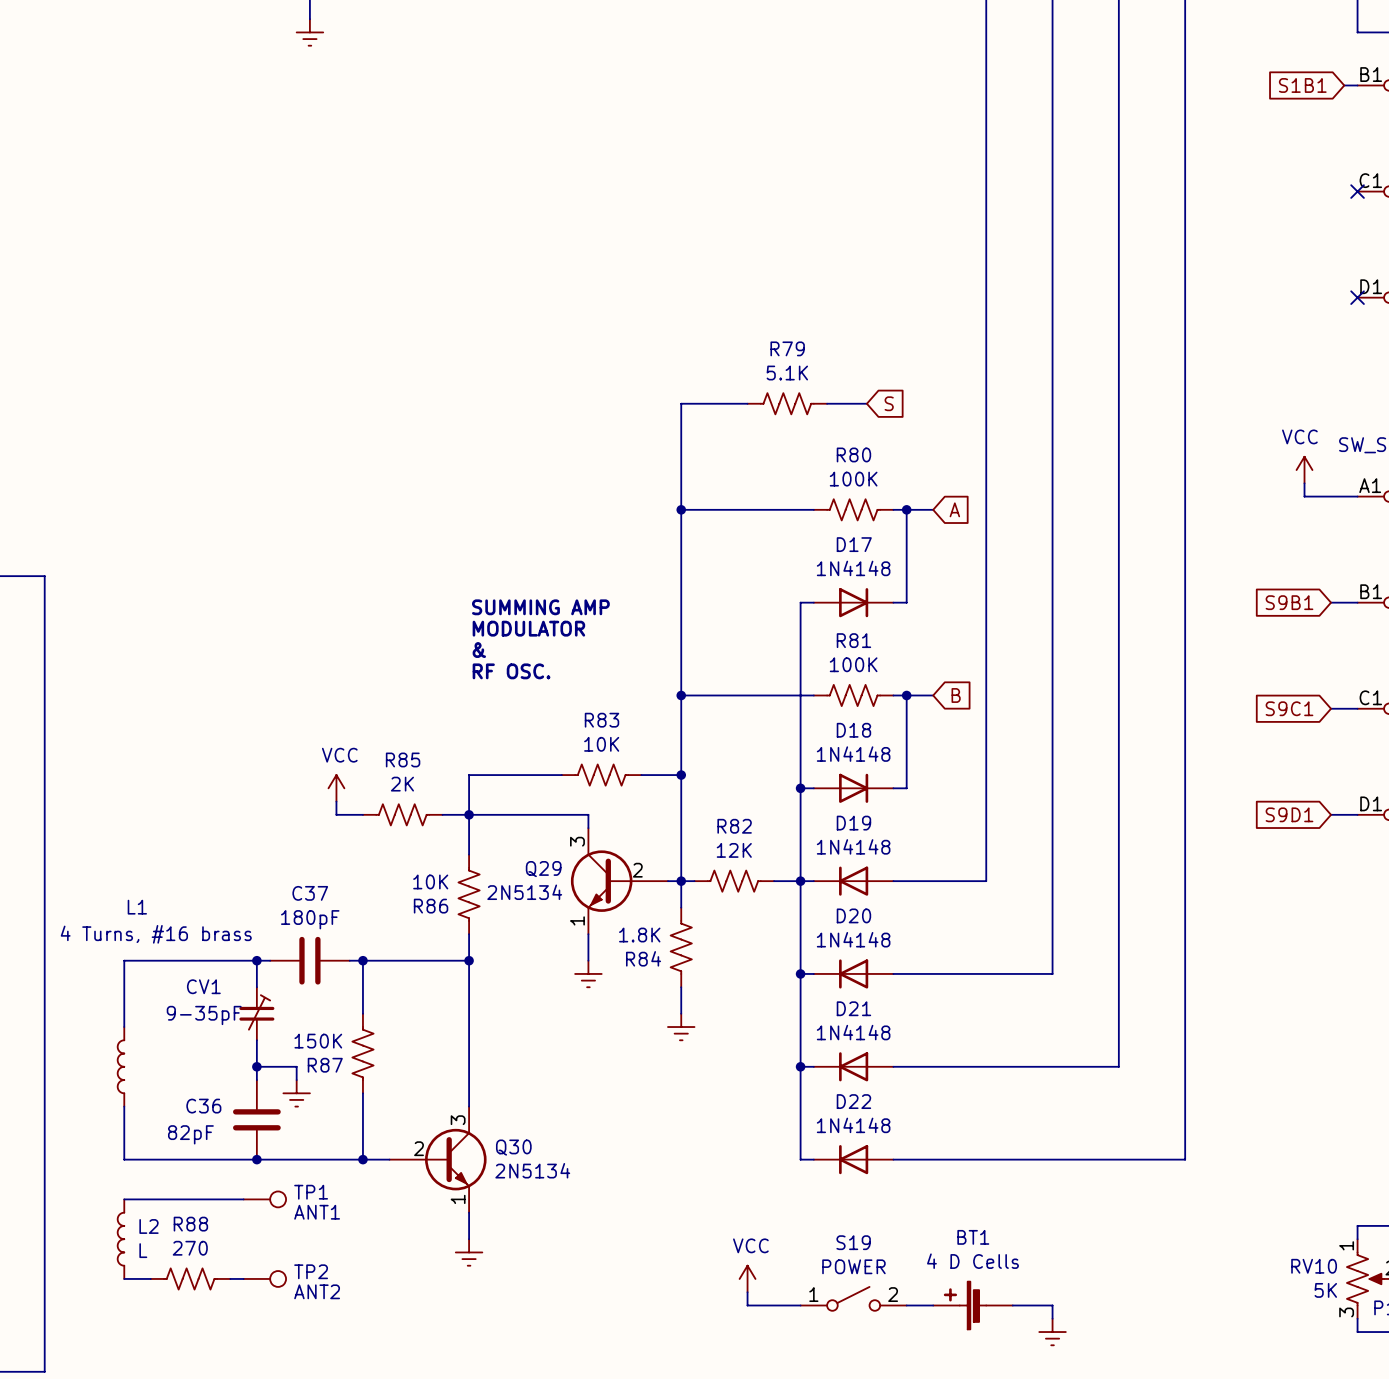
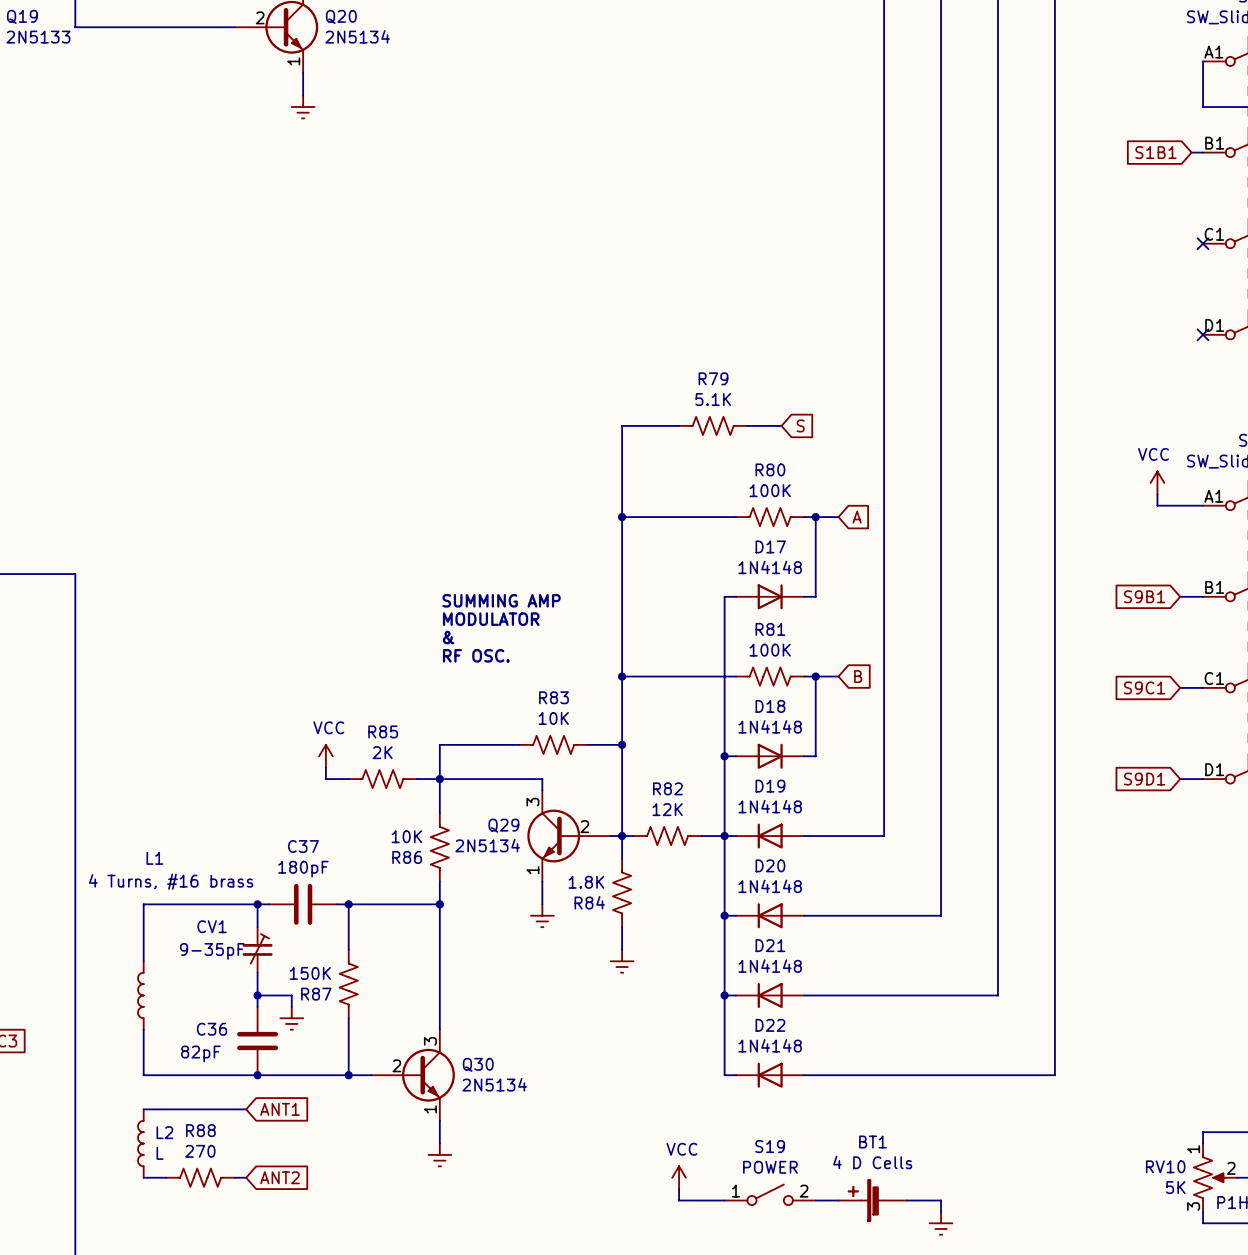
TP1: ANT1 (264, 1199) -> none
global label: none -> ANT1 (279, 1109)
TP2: ANT2 (264, 1278) -> none
global label: none -> ANT2 (279, 1177)

